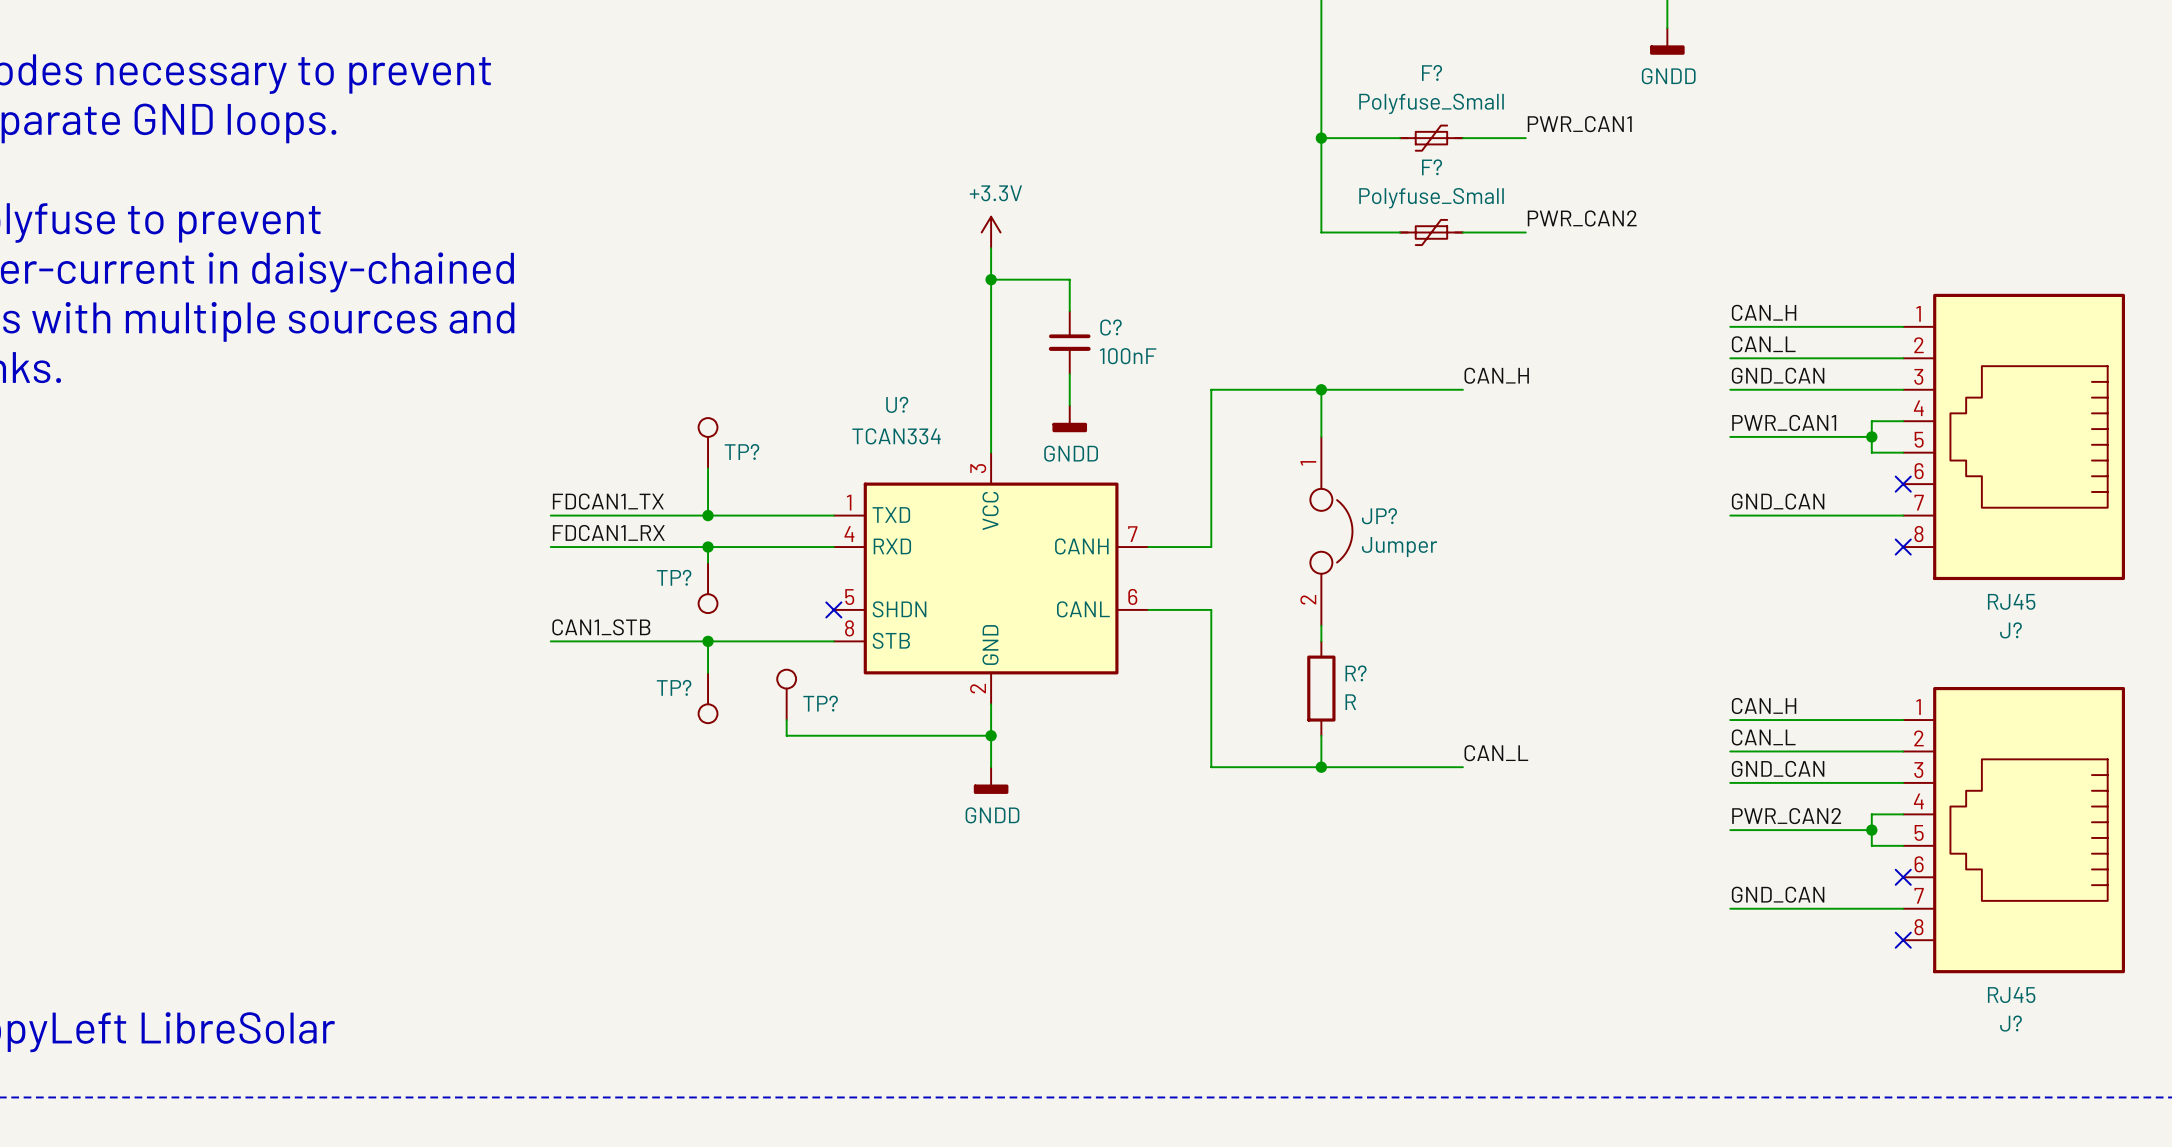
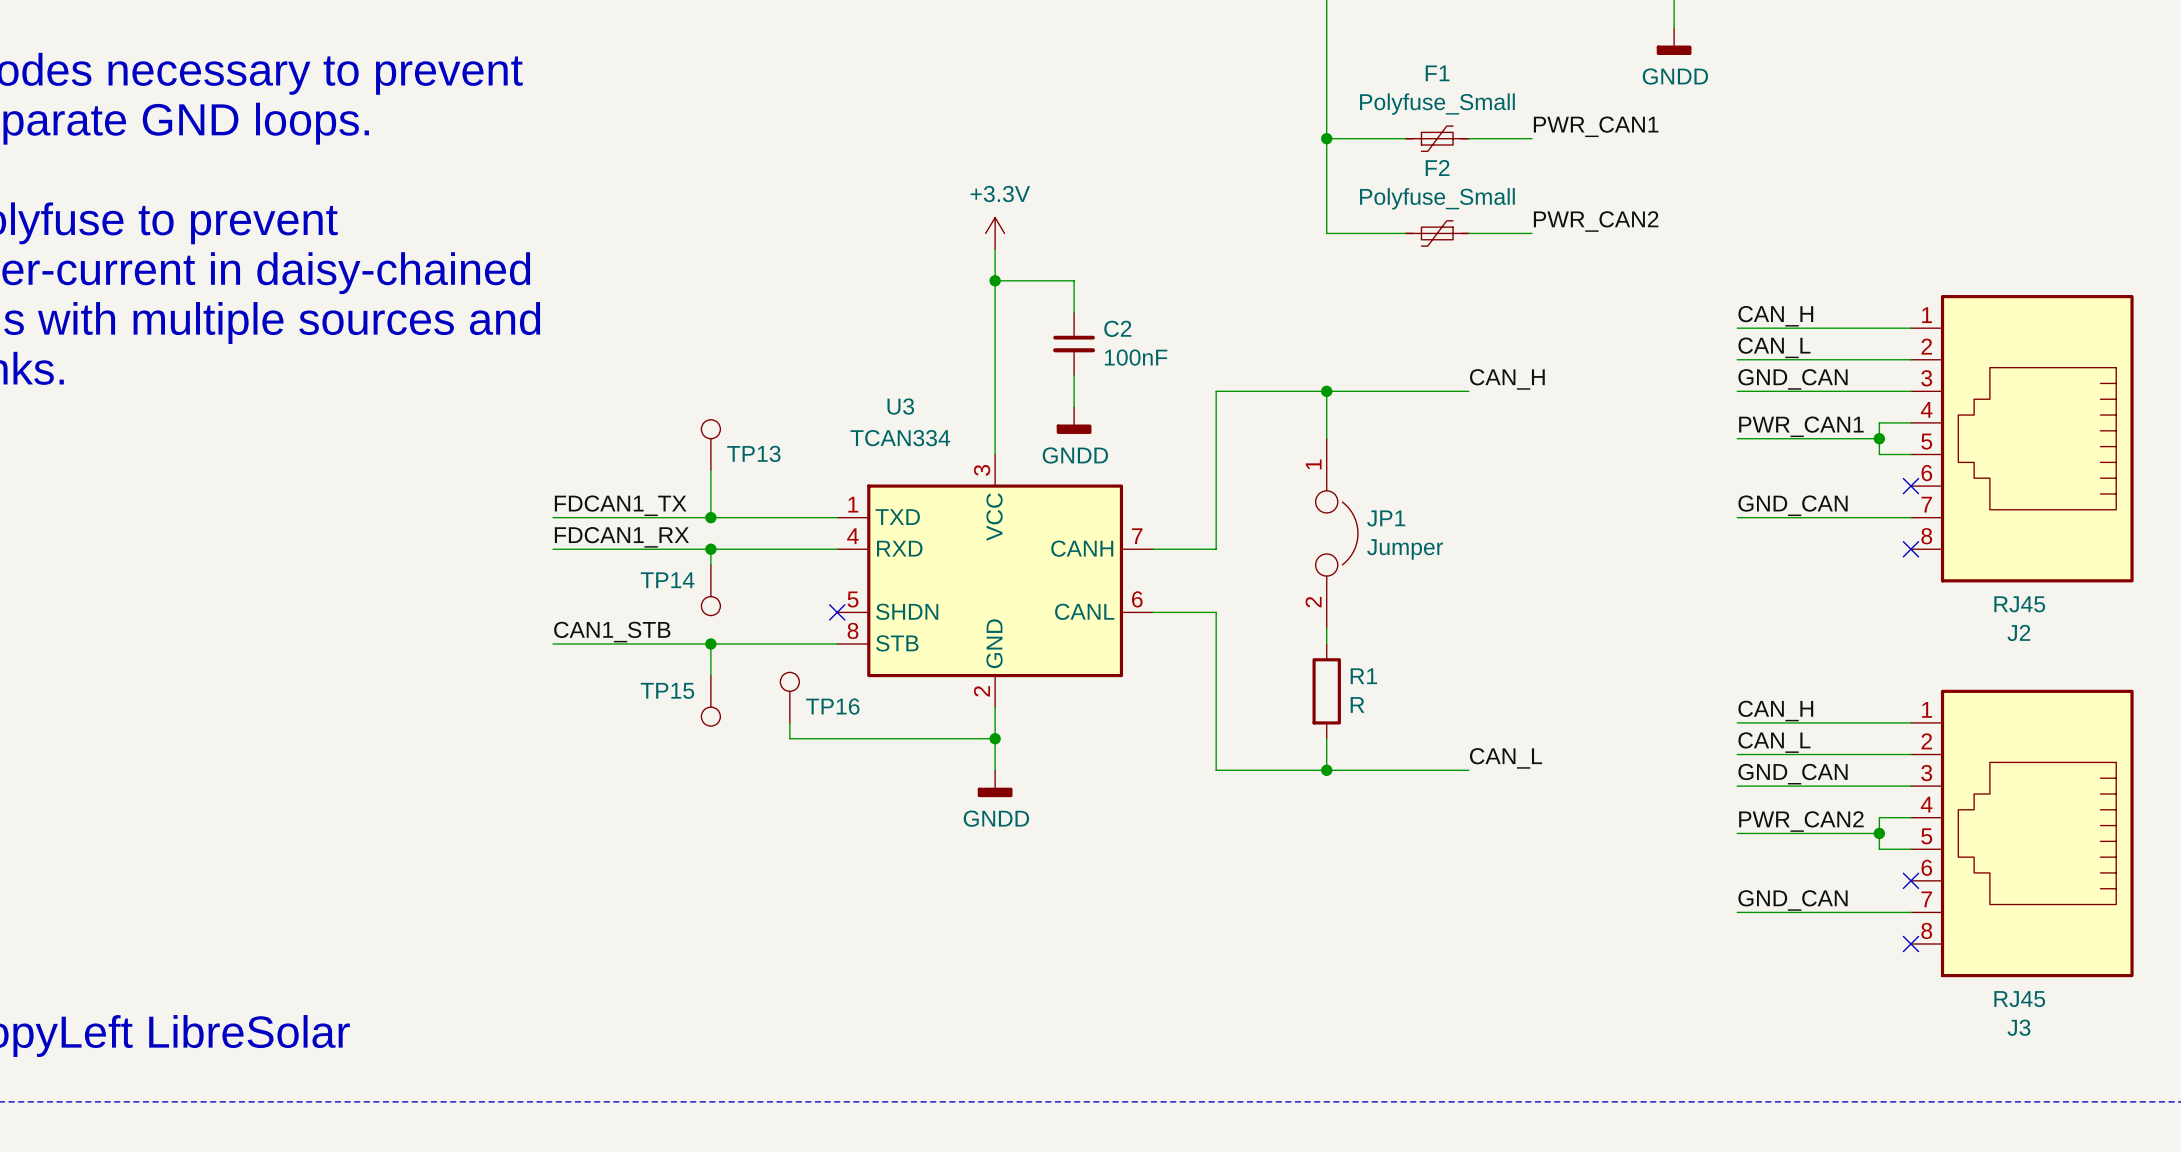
F? name: F? (1432, 72) -> F1 (1437, 73)
F? name: F? (1432, 167) -> F2 (1437, 167)
C? name: C? (1111, 327) -> C2 (1117, 328)
U? name: U? (897, 404) -> U3 (900, 406)
TP? name: TP? (741, 451) -> TP13 (753, 453)
JP? name: JP? (1379, 516) -> JP1 (1386, 518)
TP? name: TP? (674, 577) -> TP14 (667, 580)
J? name: J? (2010, 630) -> J2 (2018, 632)
R? name: R? (1356, 673) -> R1 (1363, 676)
TP? name: TP? (674, 687) -> TP15 (667, 690)
TP? name: TP? (820, 703) -> TP16 (832, 706)
J? name: J? (2010, 1023) -> J3 (2018, 1027)

